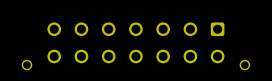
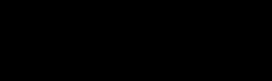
part: (135, 46) -> none

